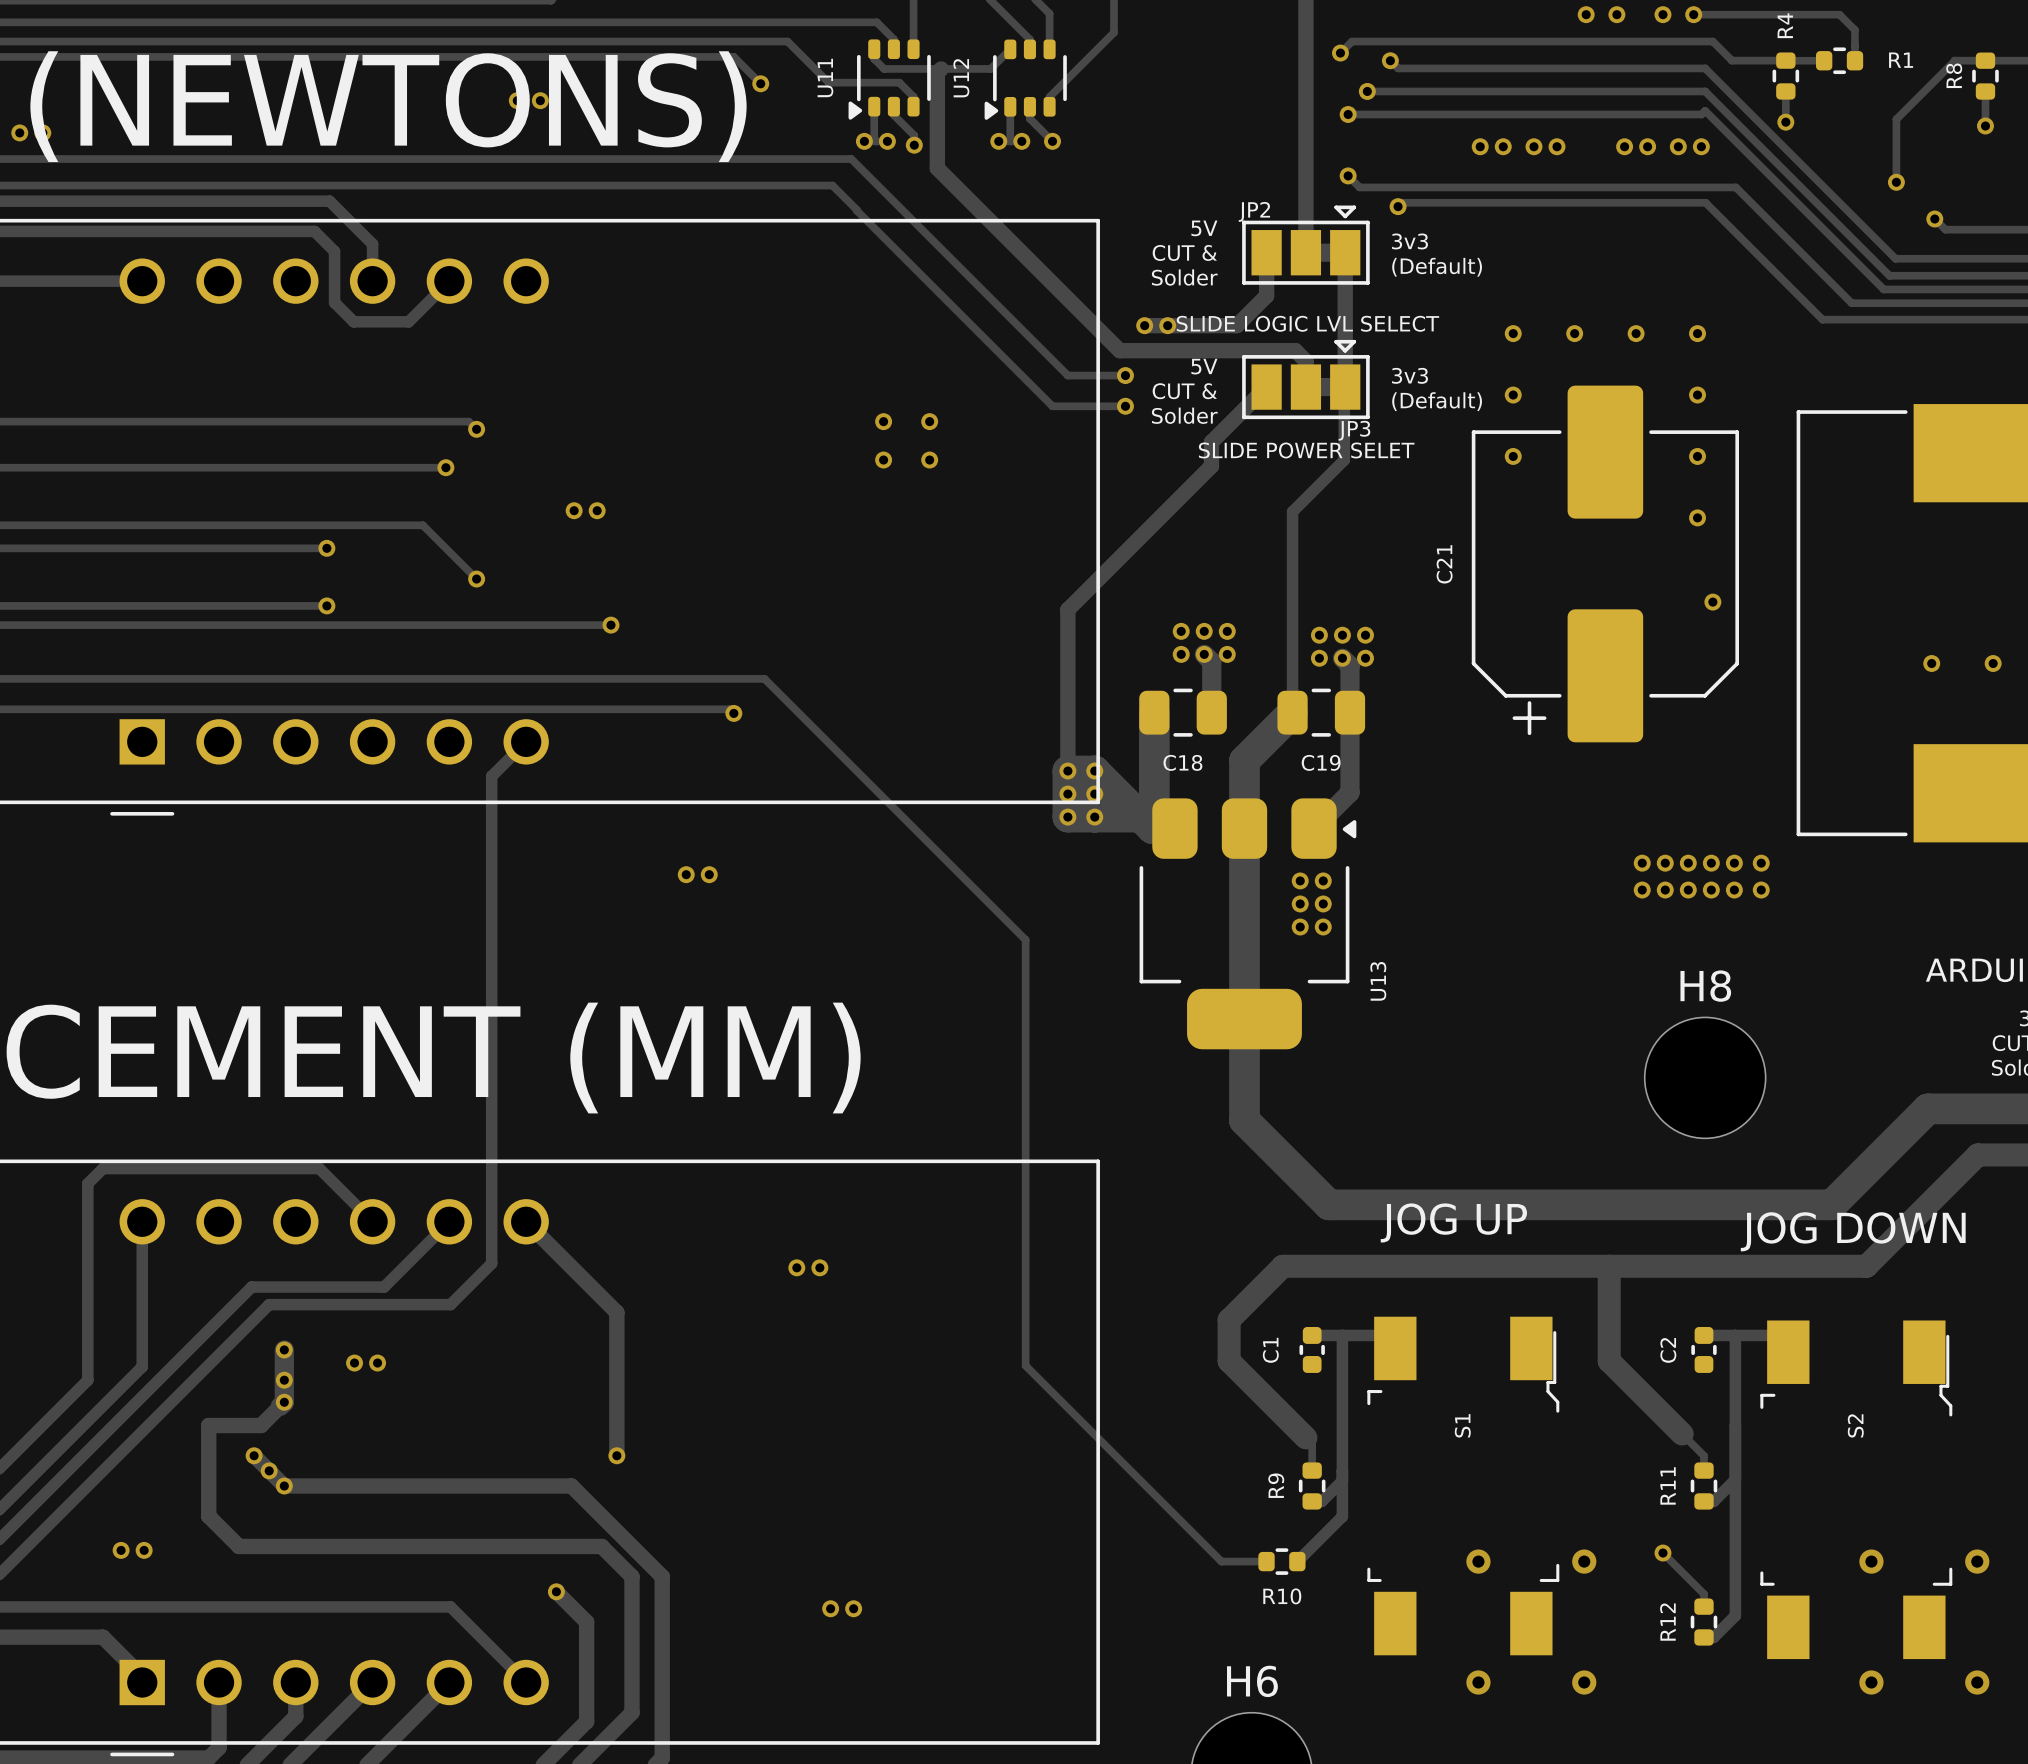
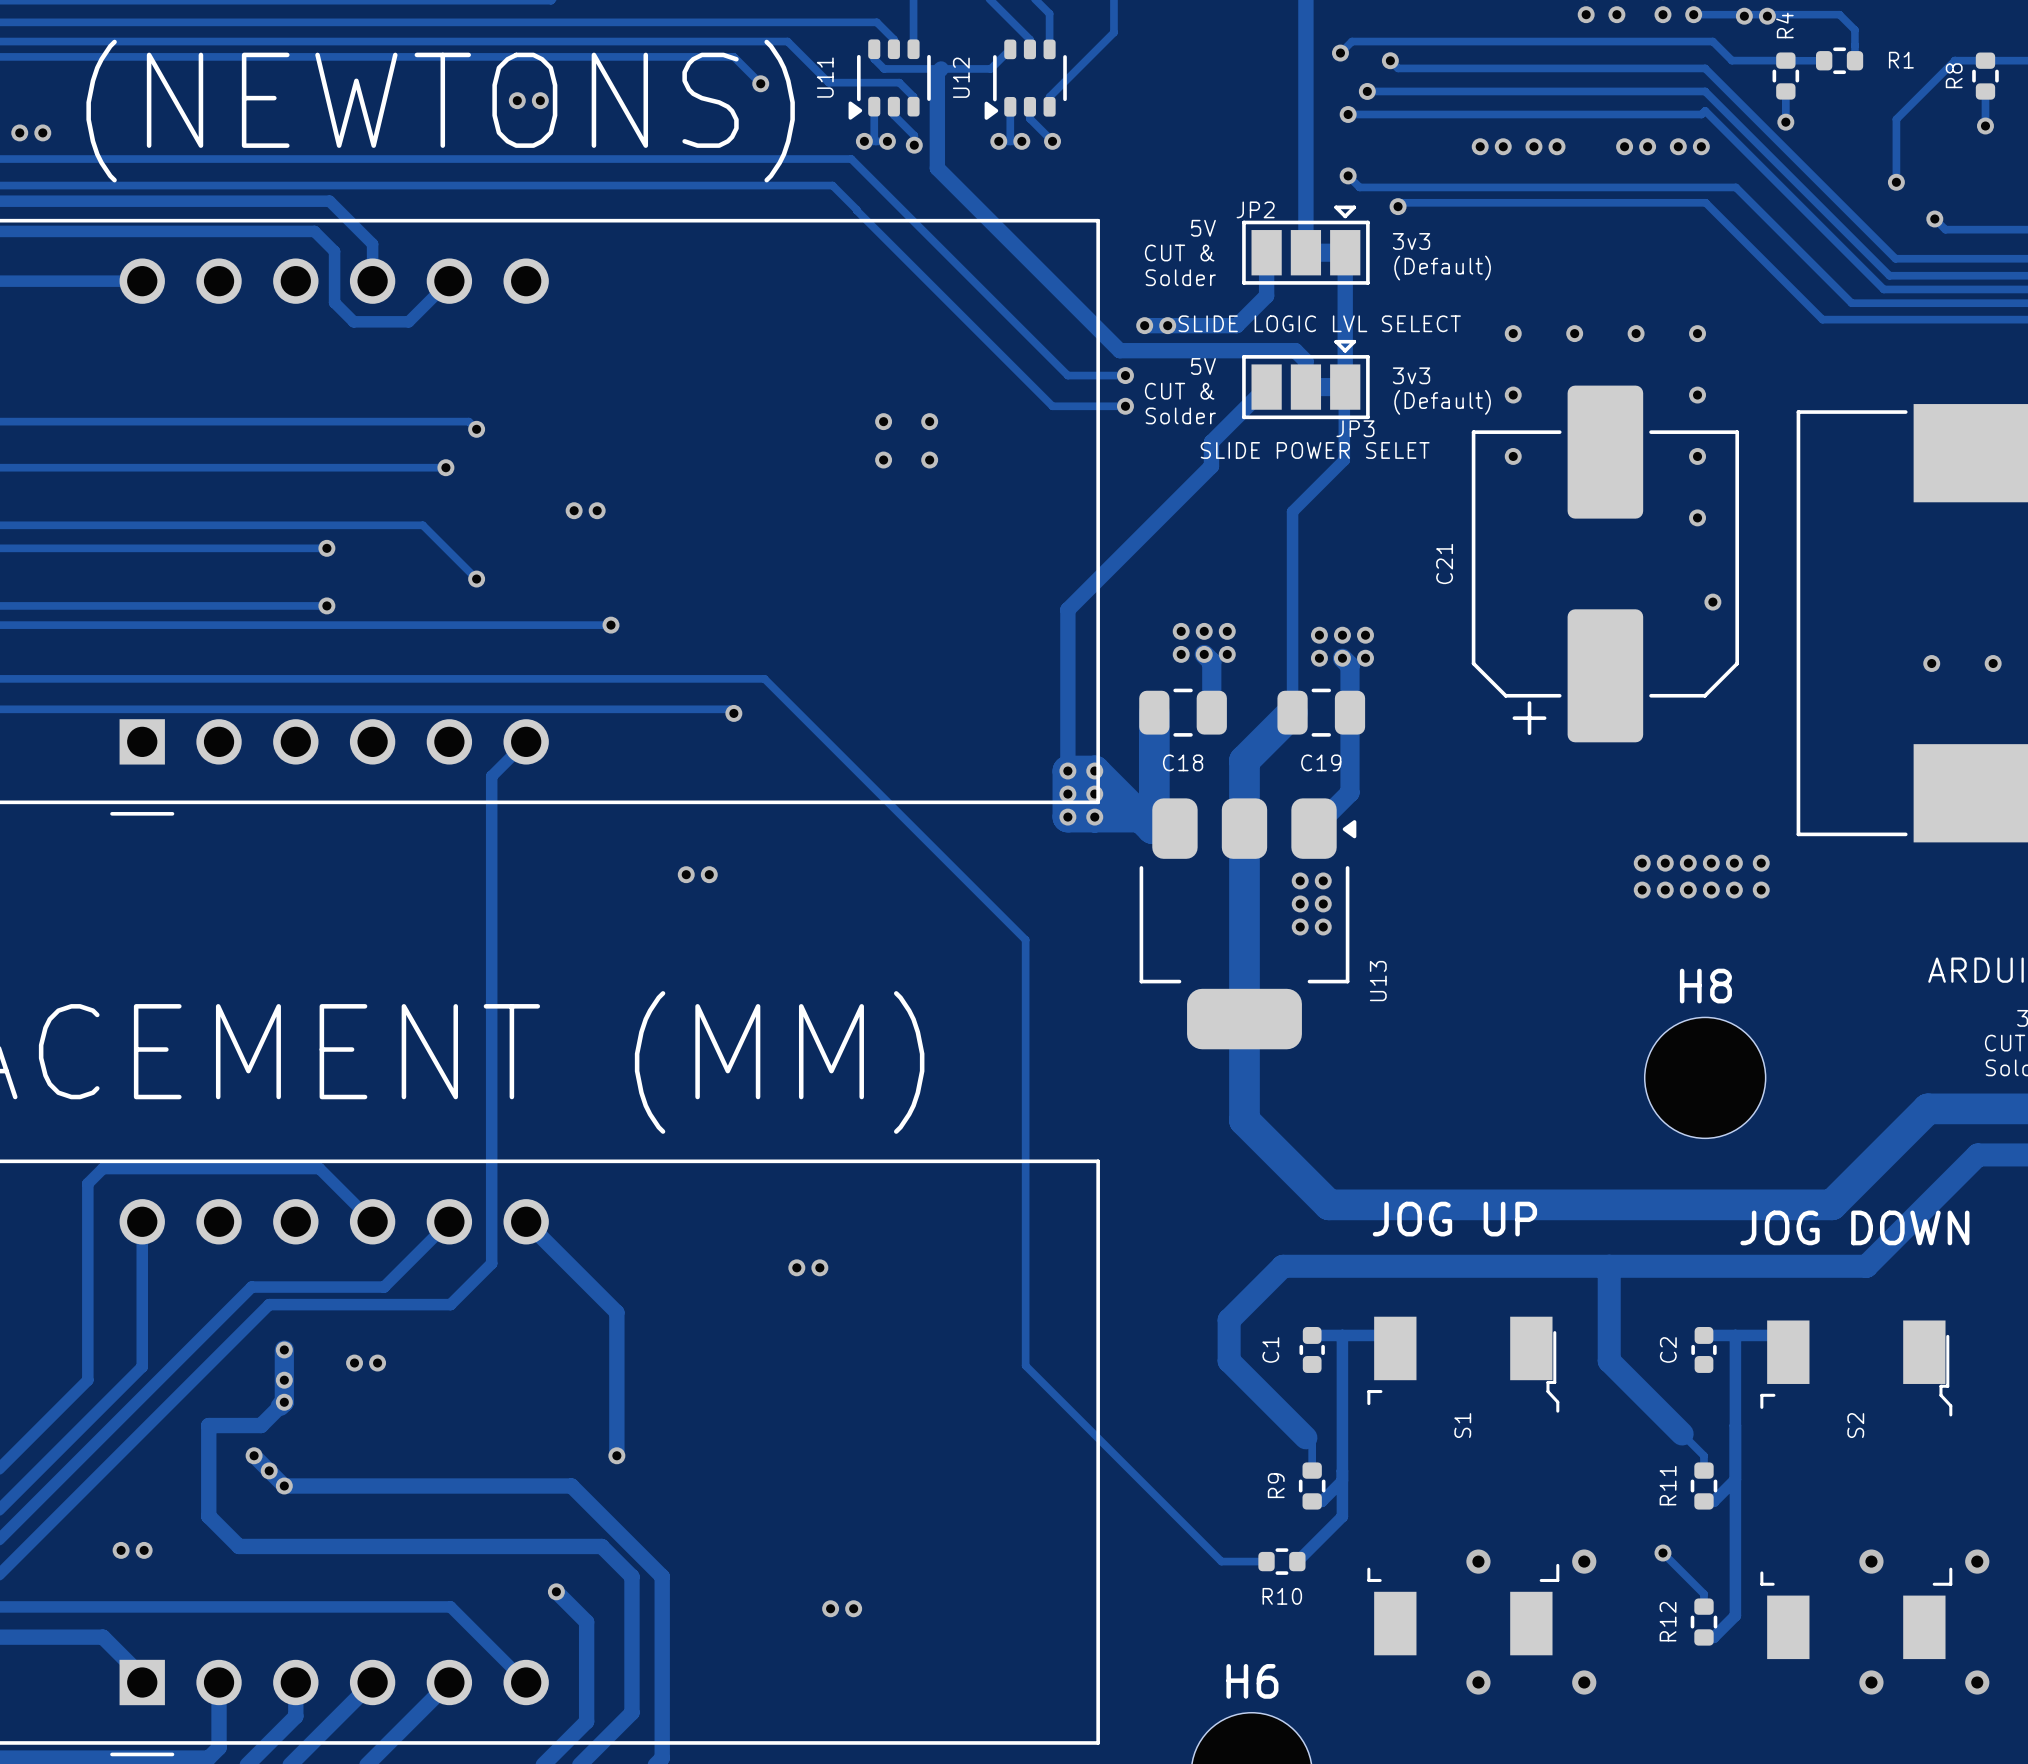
via: none -> (1744, 16)
via: none -> (1767, 16)

